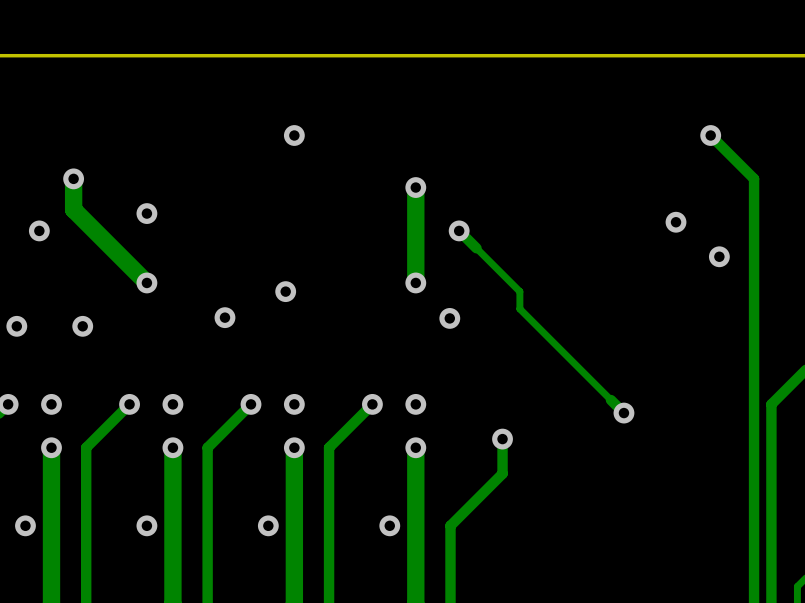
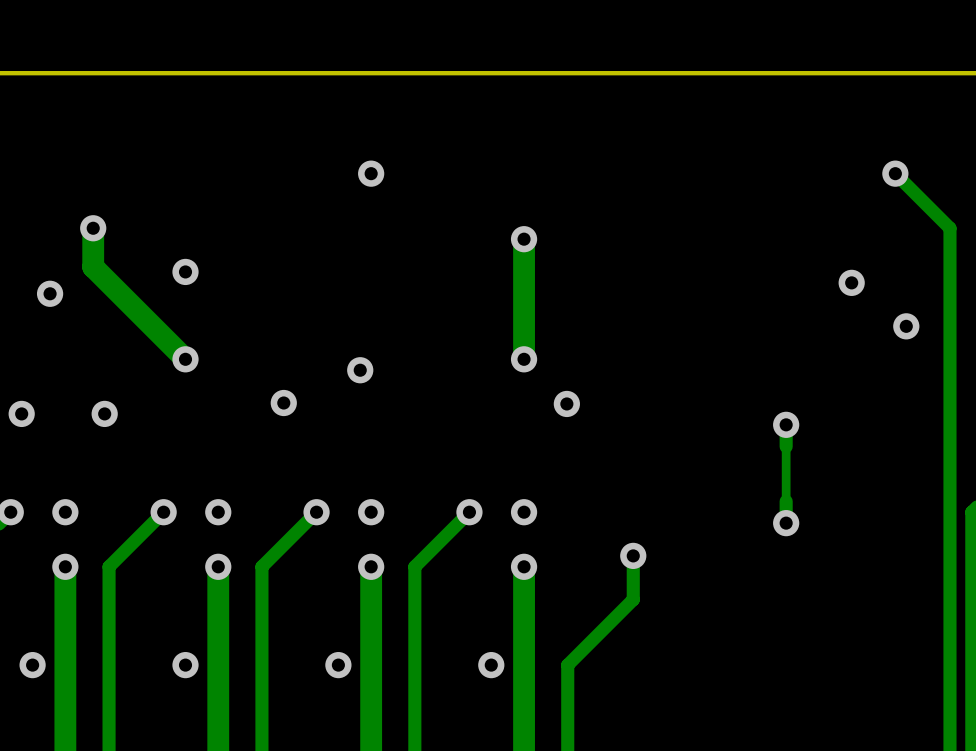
track: (459, 230) (519, 291) (519, 308) (623, 413) -> (786, 424) (786, 523)
via position: (459, 230) -> (786, 424)

